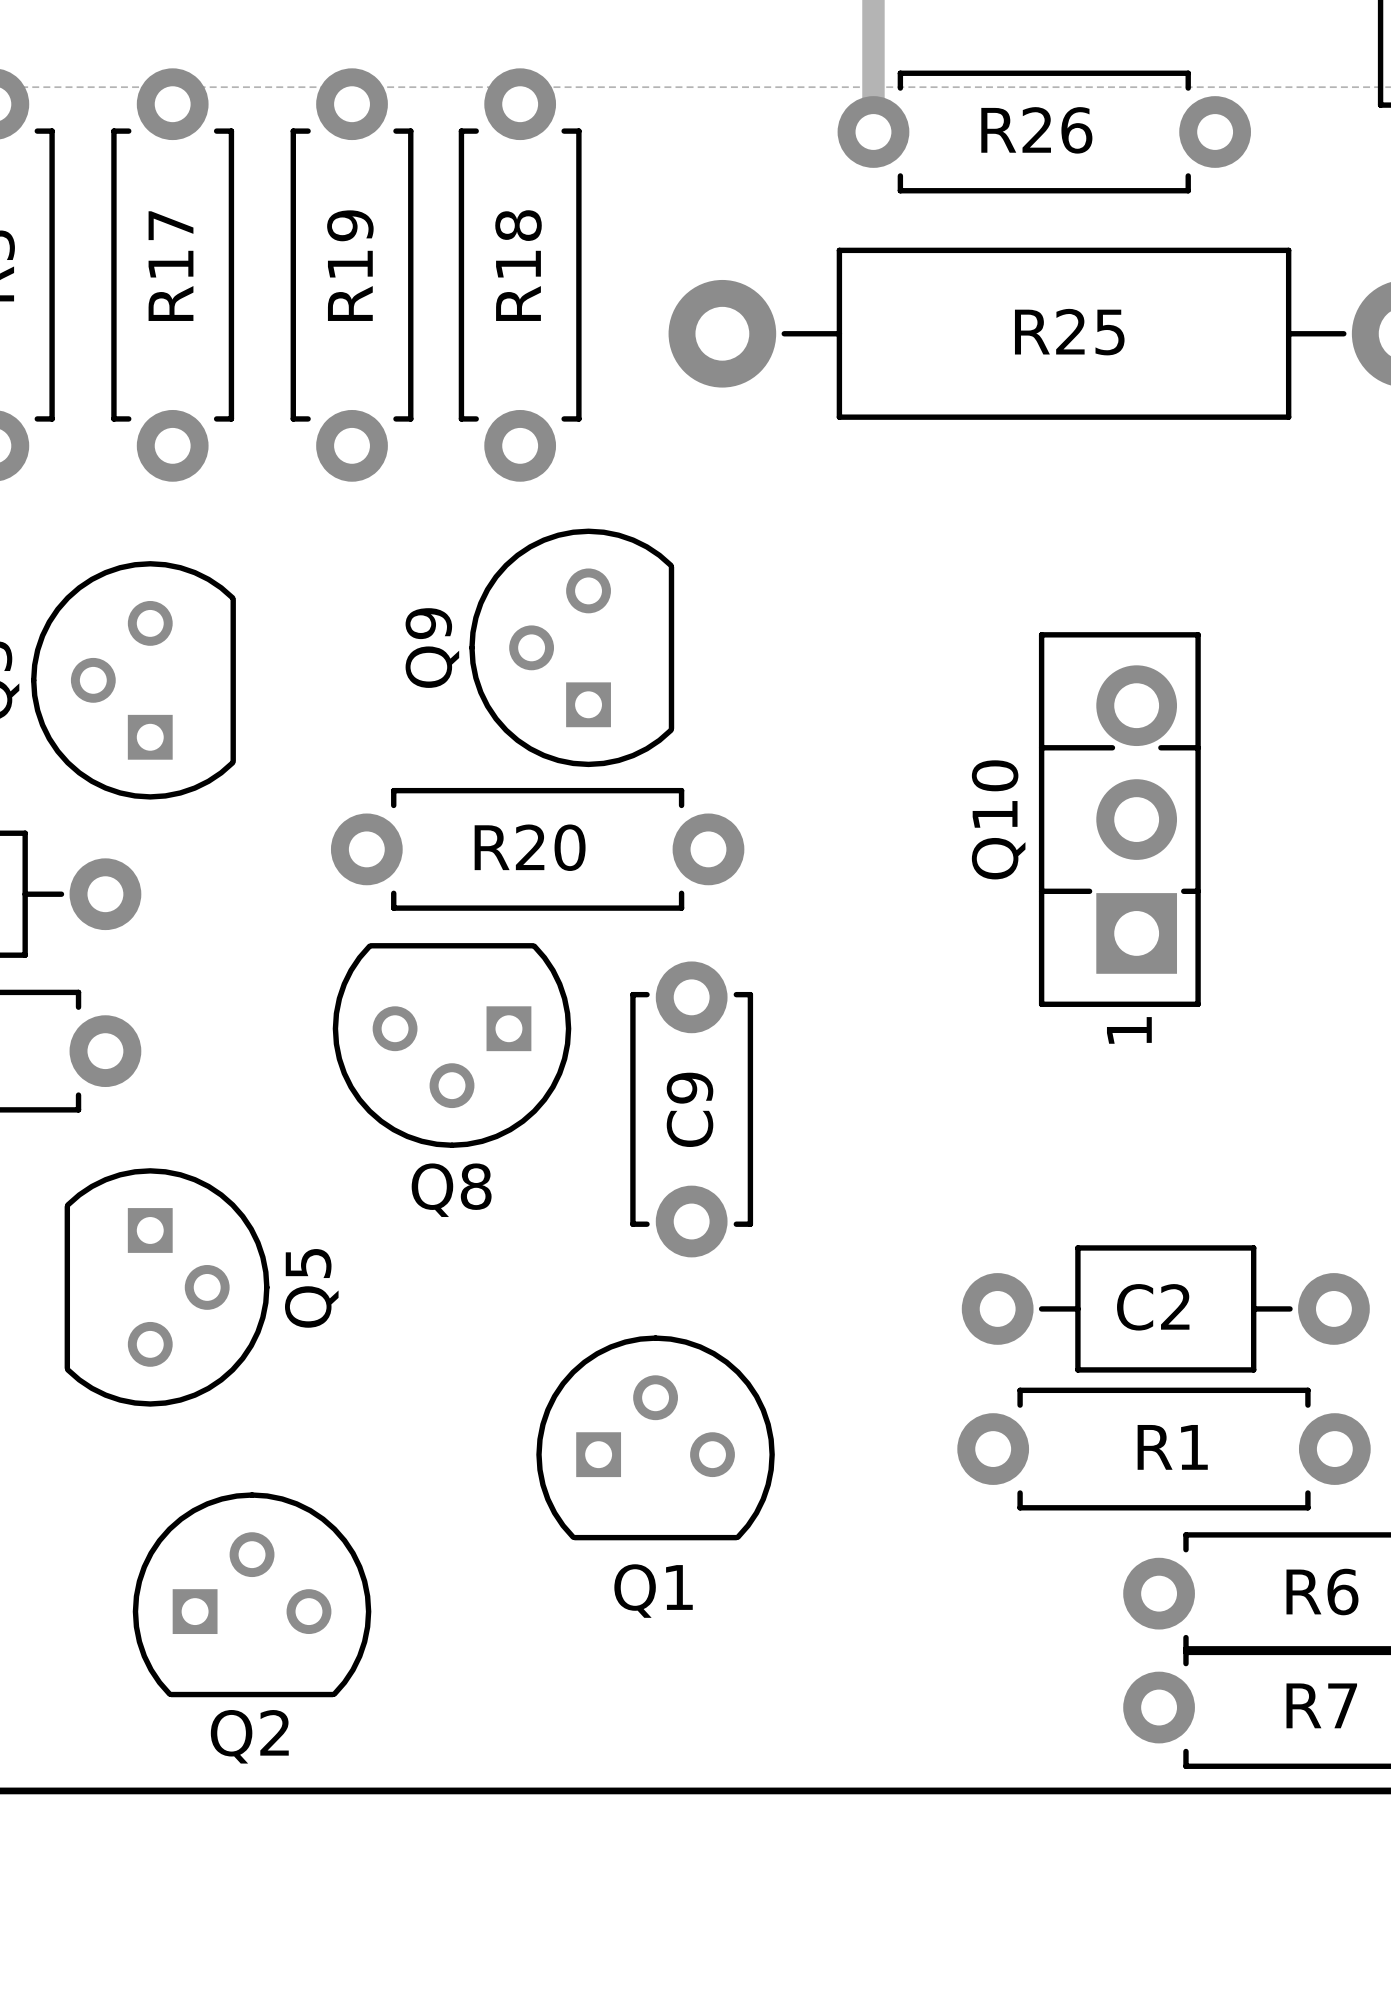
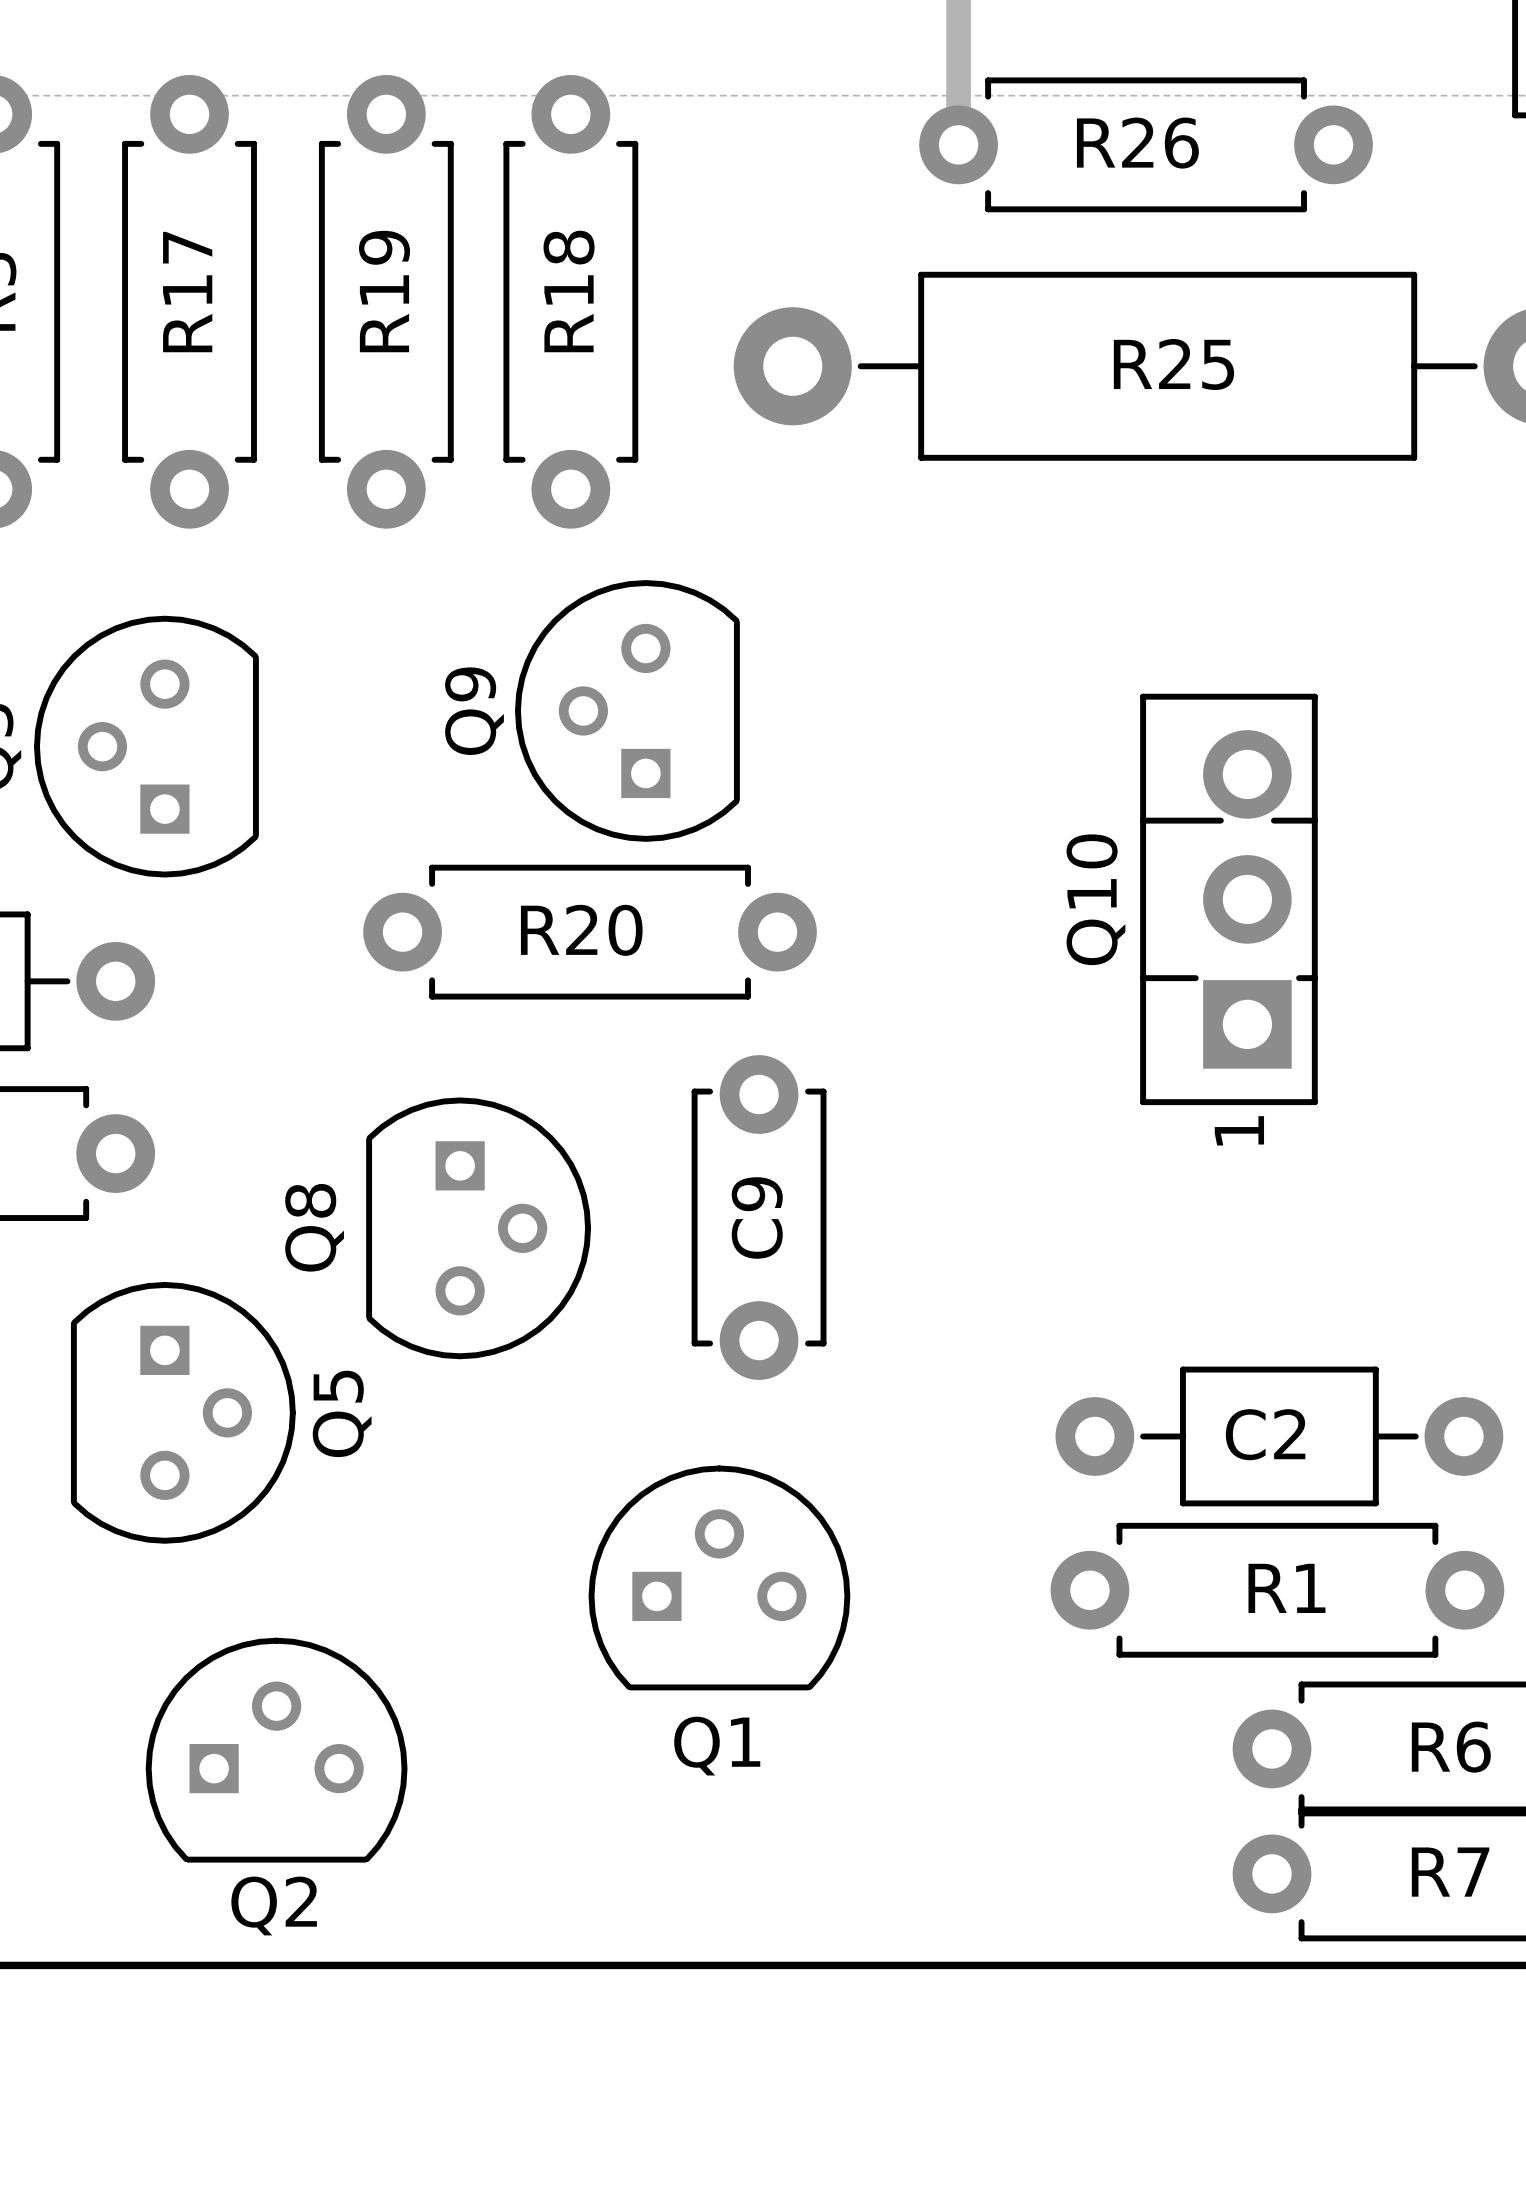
Q8 rotation: 0° (452, 1045) -> 90° counterclockwise (478, 1228)
Q8 name position: Q8 (451, 1190) -> Q8 (314, 1227)

